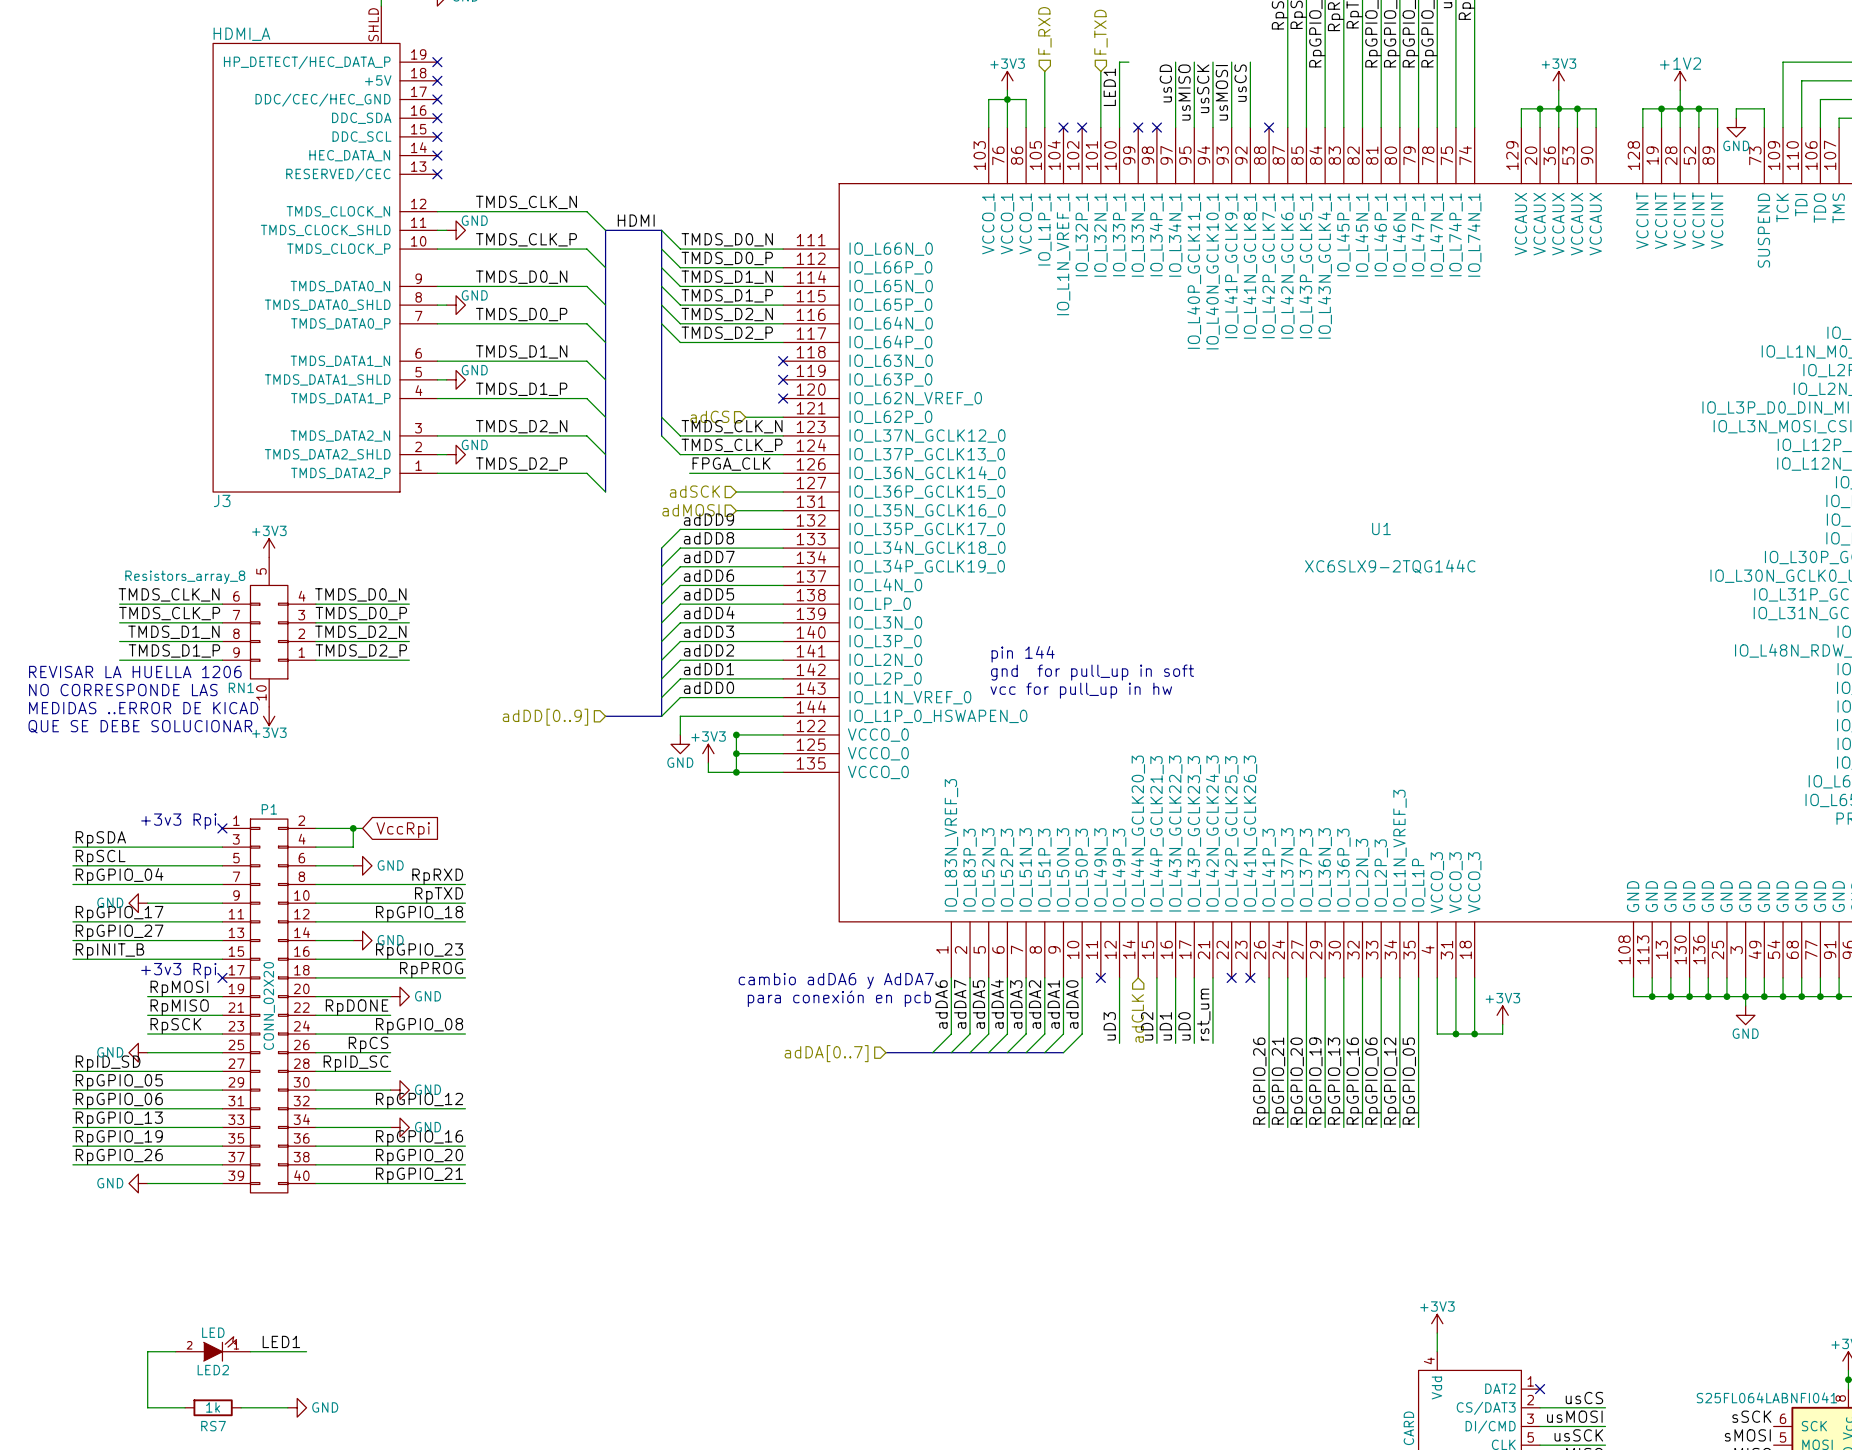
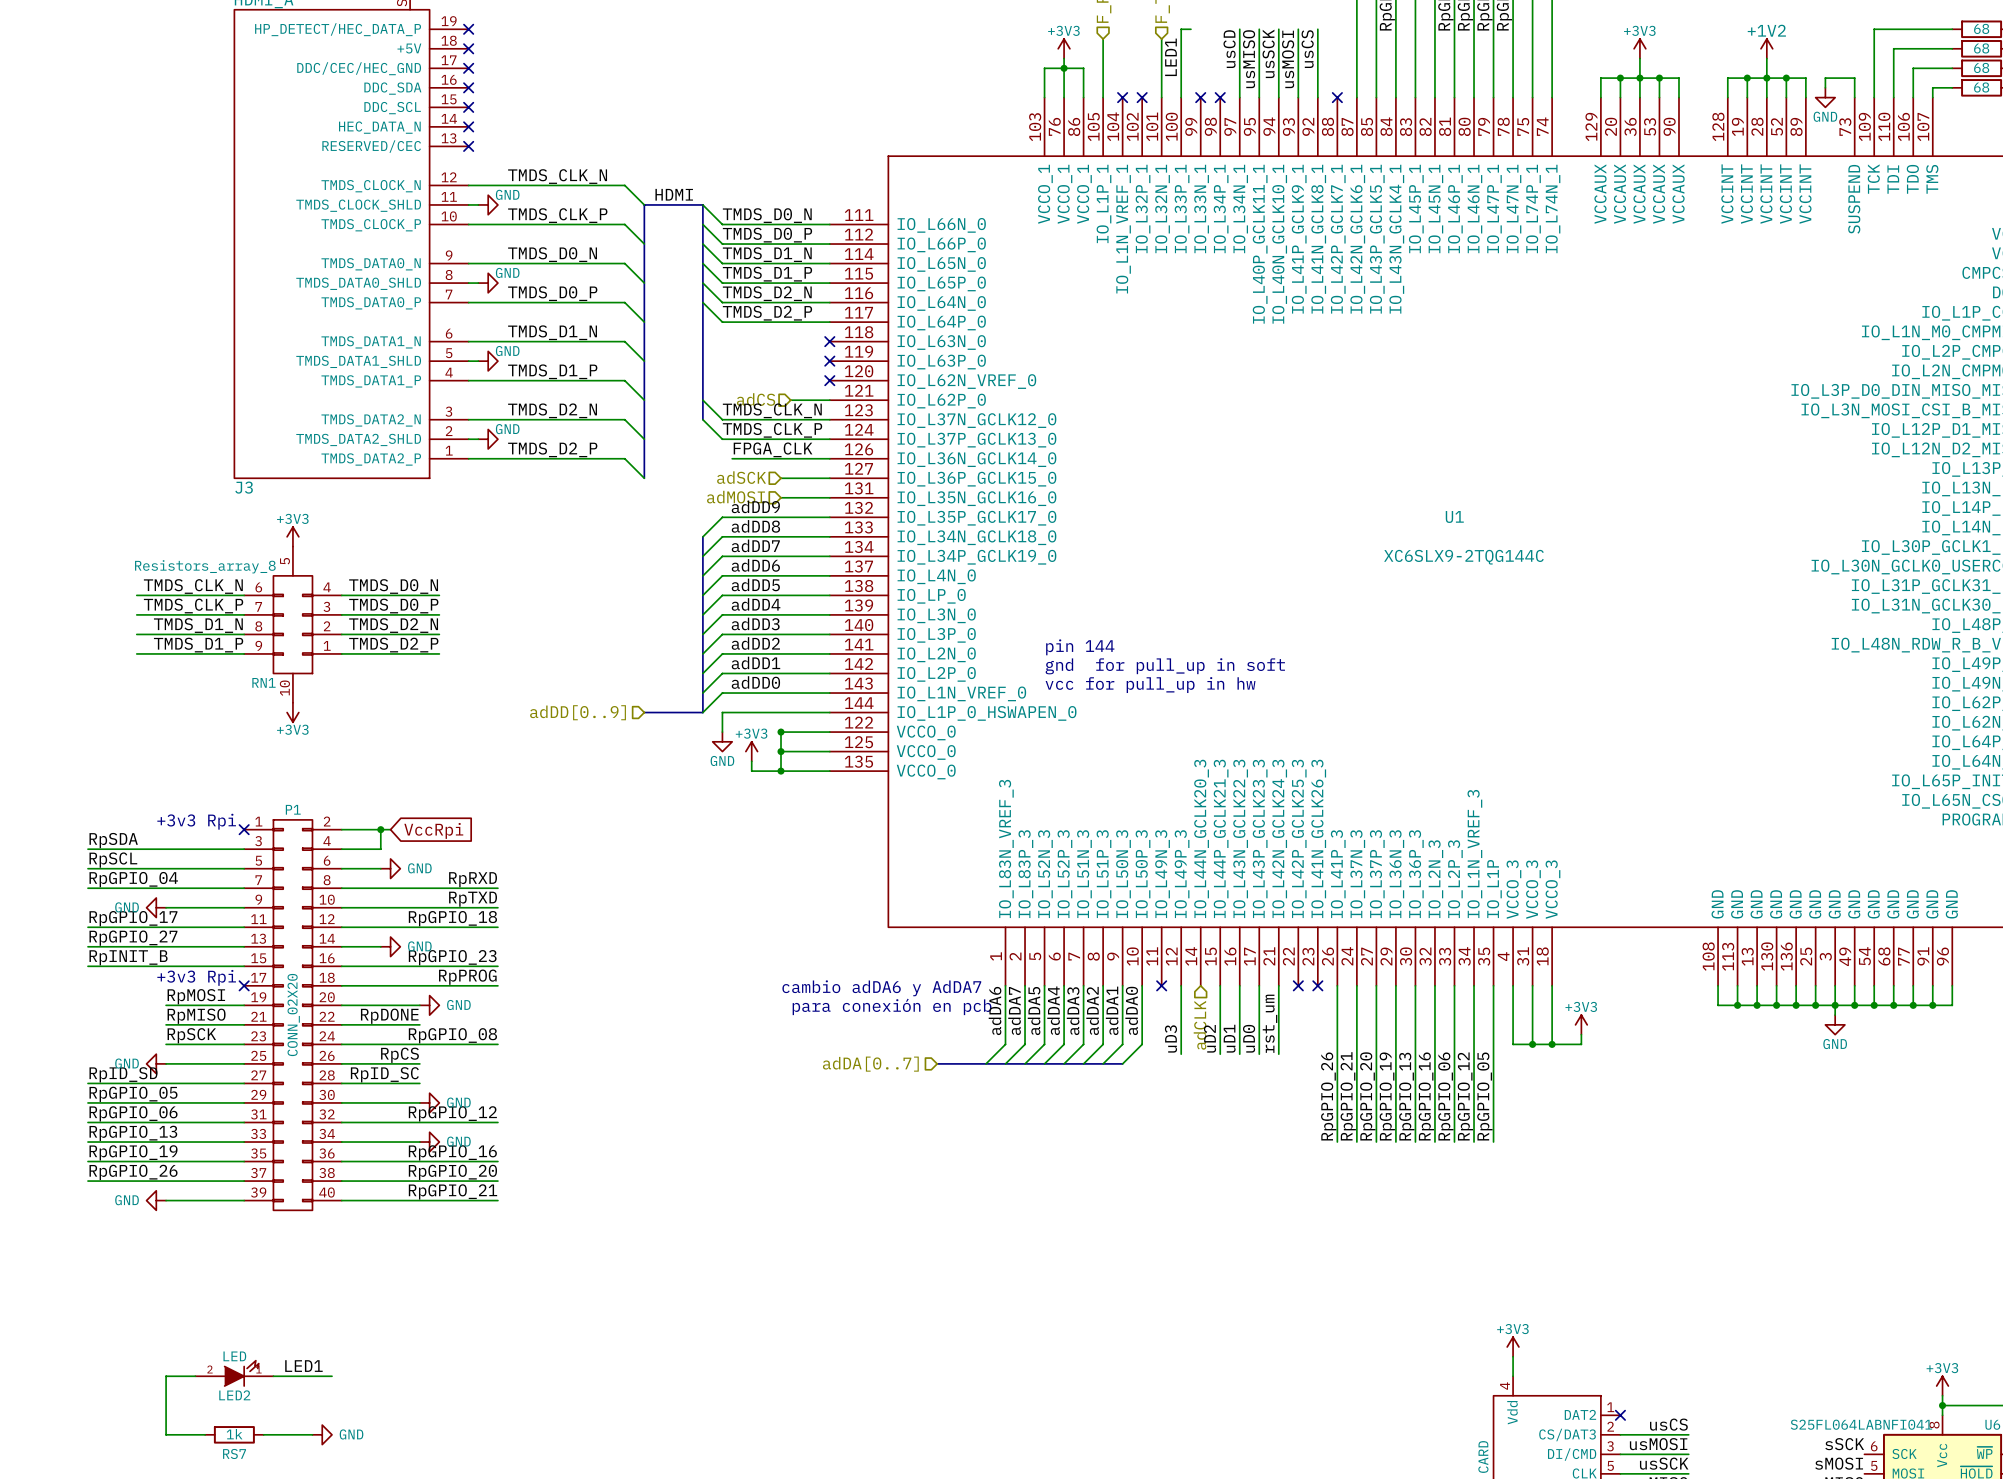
text: REVISAR LA HUELLA 1206 (135, 671) -> none
text: NO CORRESPONDE LAS (123, 690) -> none
text: MEDIDAS ..ERROR DE KICAD (143, 708) -> none
text: QUE SE DEBE SOLUCIONAR (140, 726) -> none

